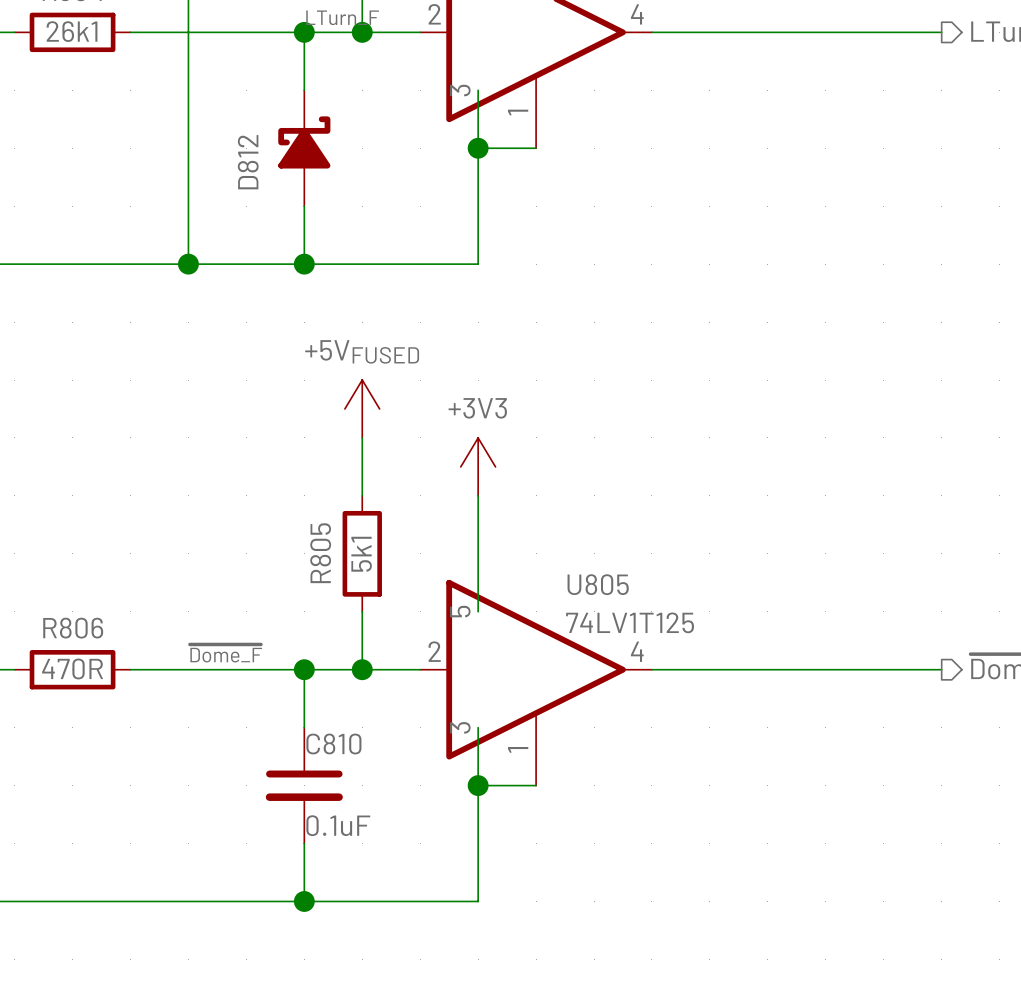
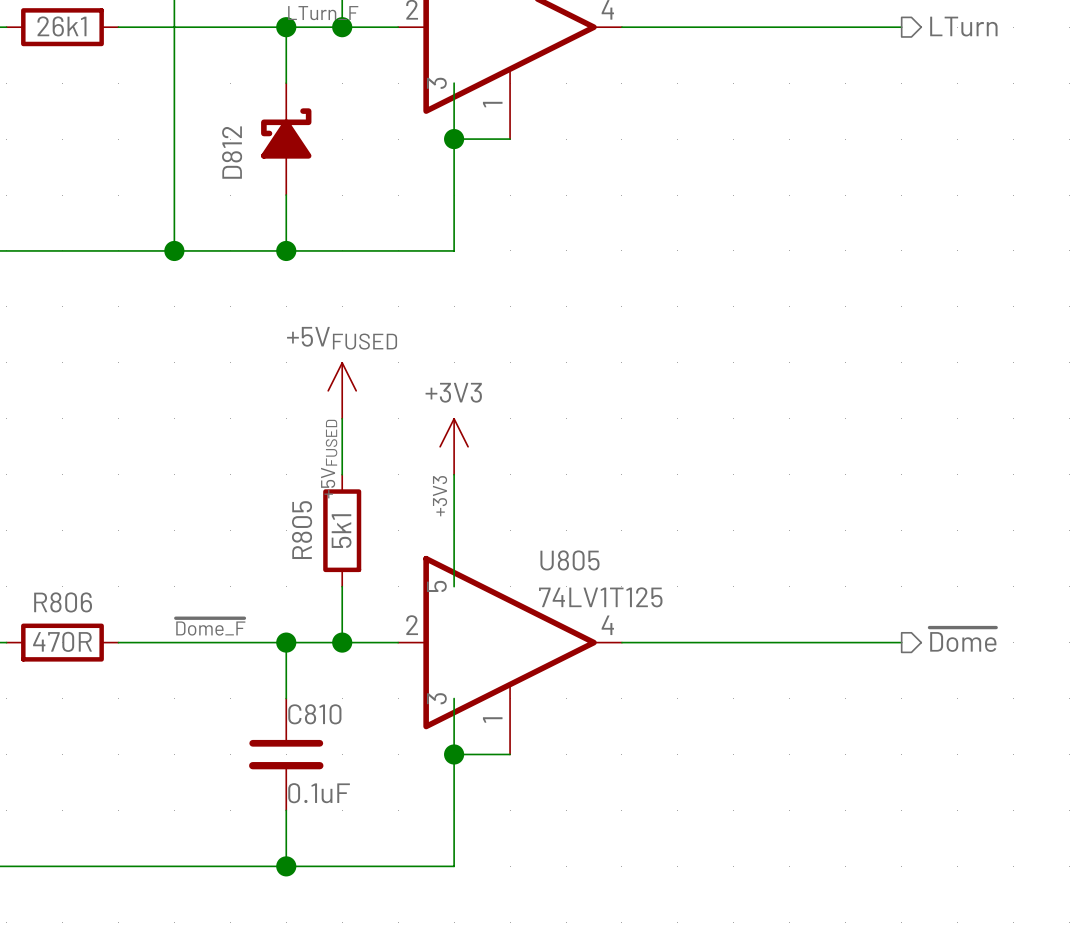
power symbol: +5VFUSED (362, 408) -> none
part: none -> +5VFUSED (342, 390)
power symbol: +3V3 (478, 466) -> none
part: none -> +3V3 (454, 446)
label: none -> +5VFUSED (329, 459)
label: none -> +3V3 (440, 496)

